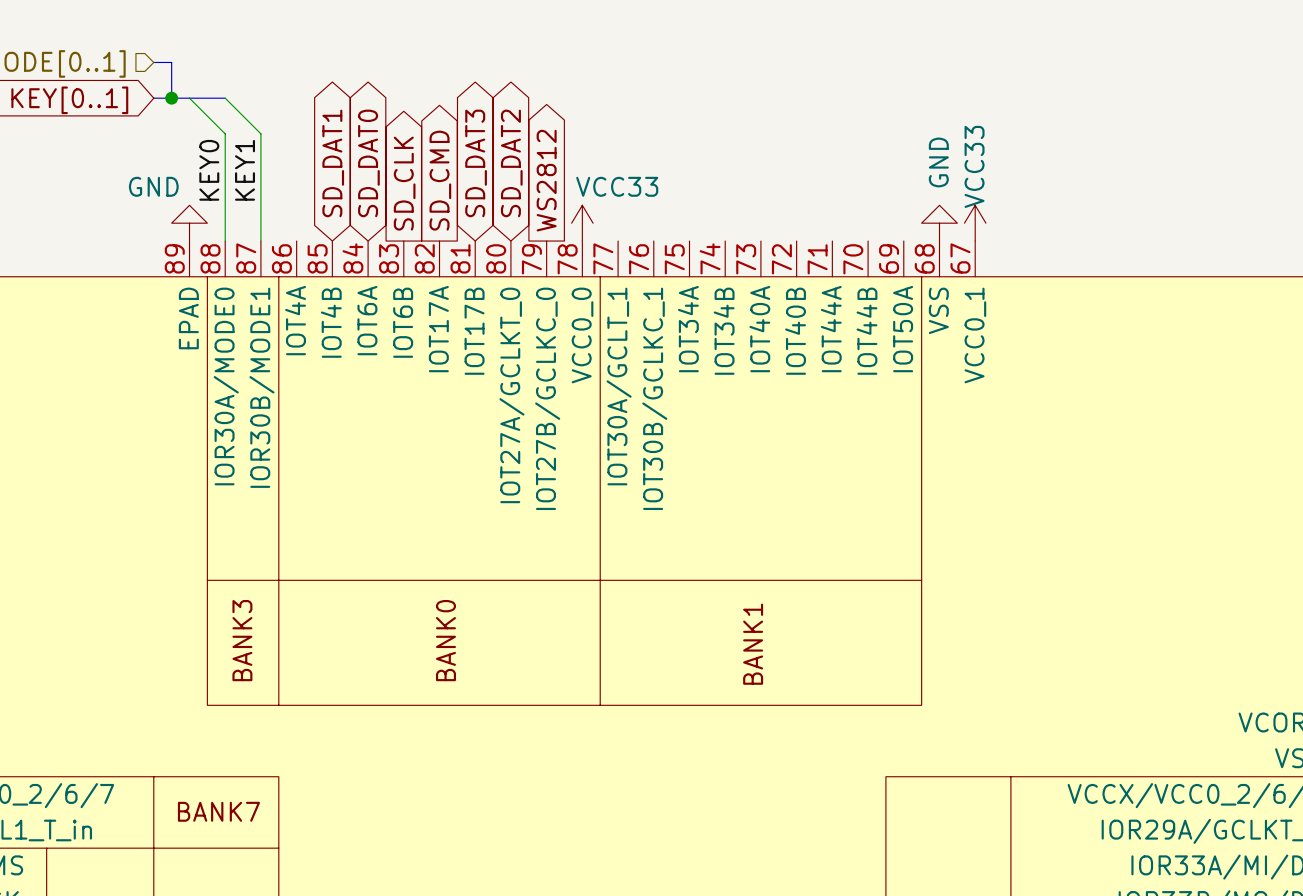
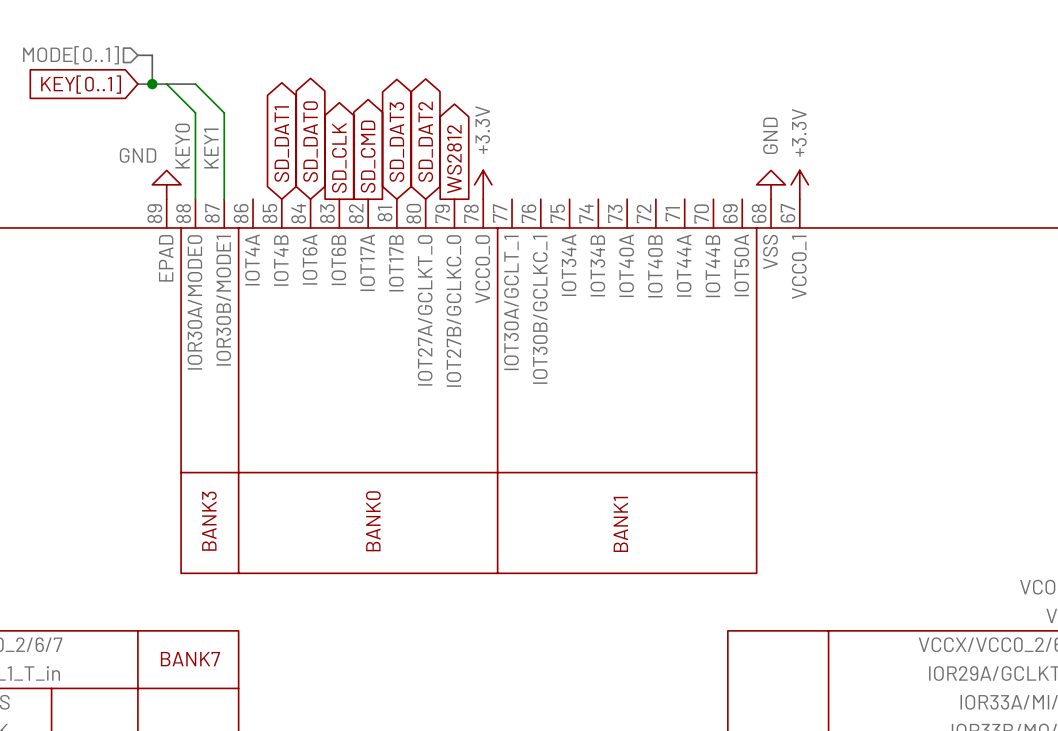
power symbol: VCC33 (582, 223) -> +3.3V (483, 184)
power symbol: VCC33 (975, 223) -> +3.3V (799, 184)

